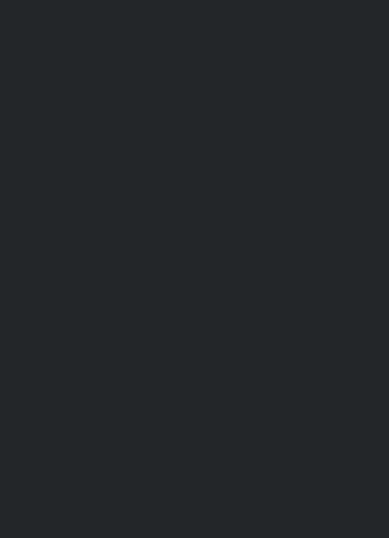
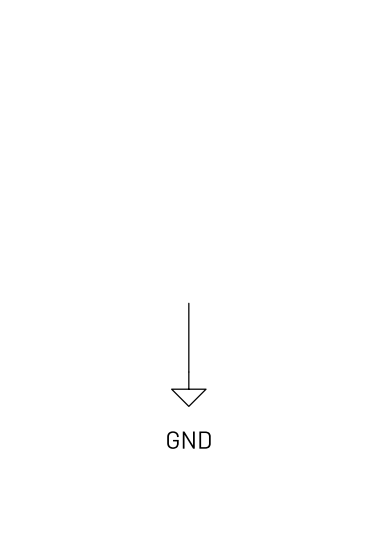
wire: none -> (188, 303) (188, 372)
power symbol: none -> GND (188, 389)

